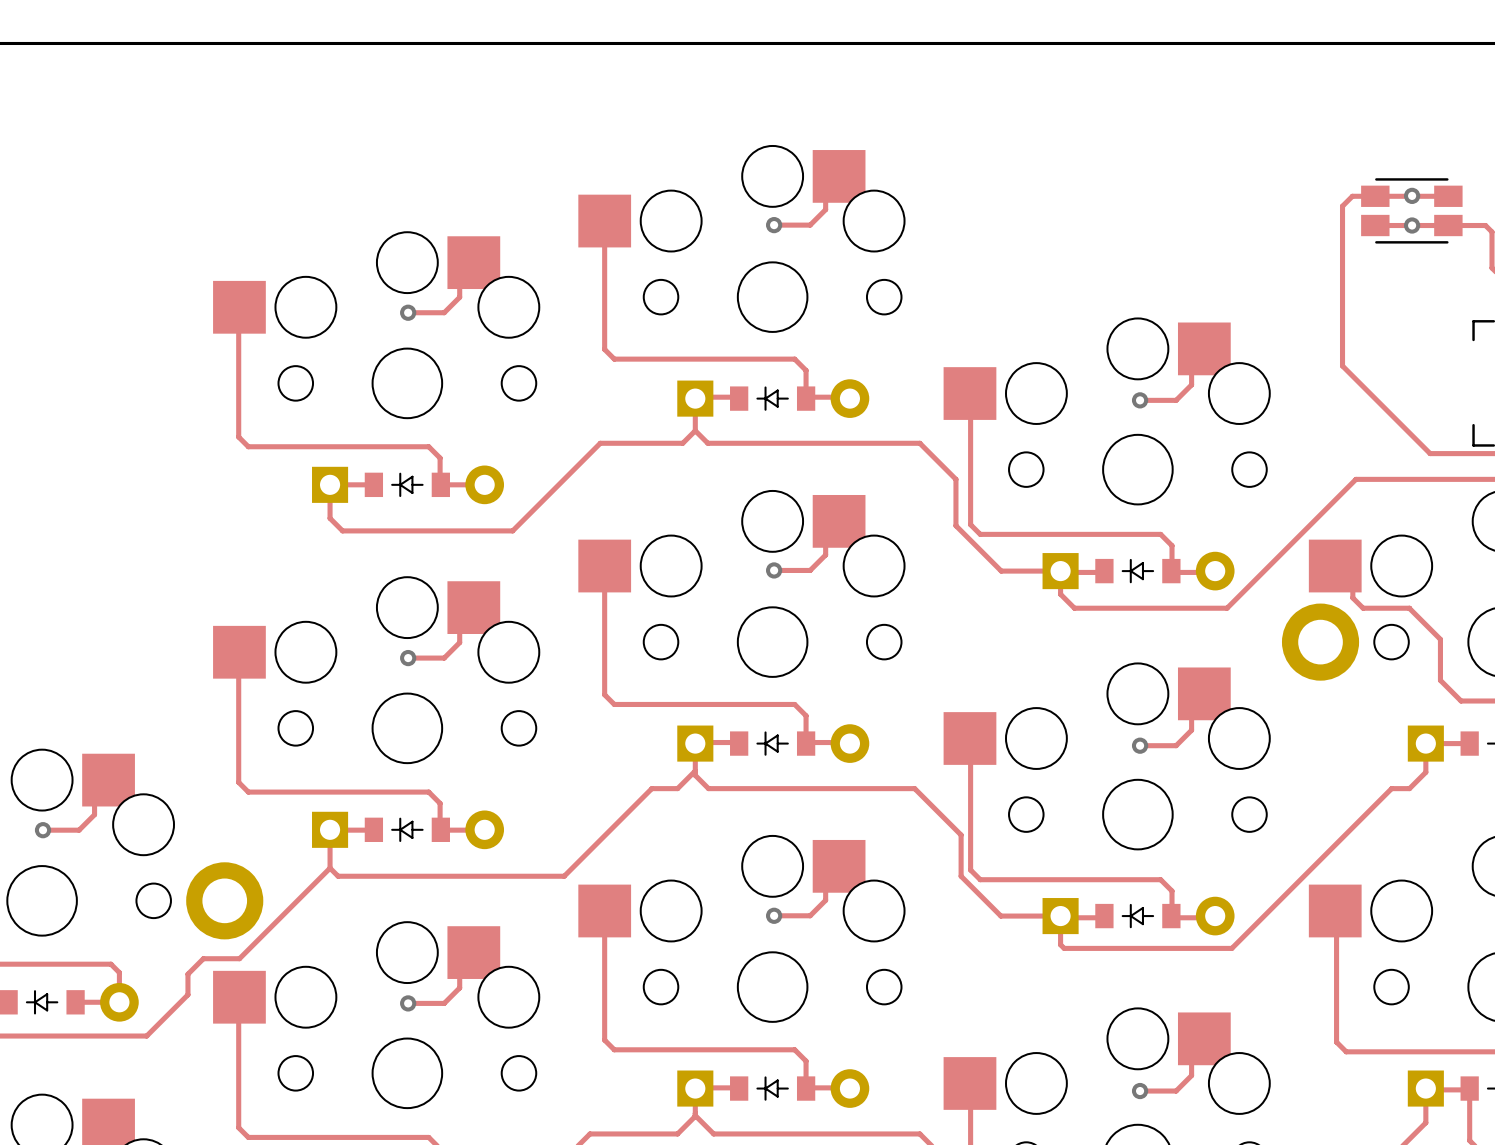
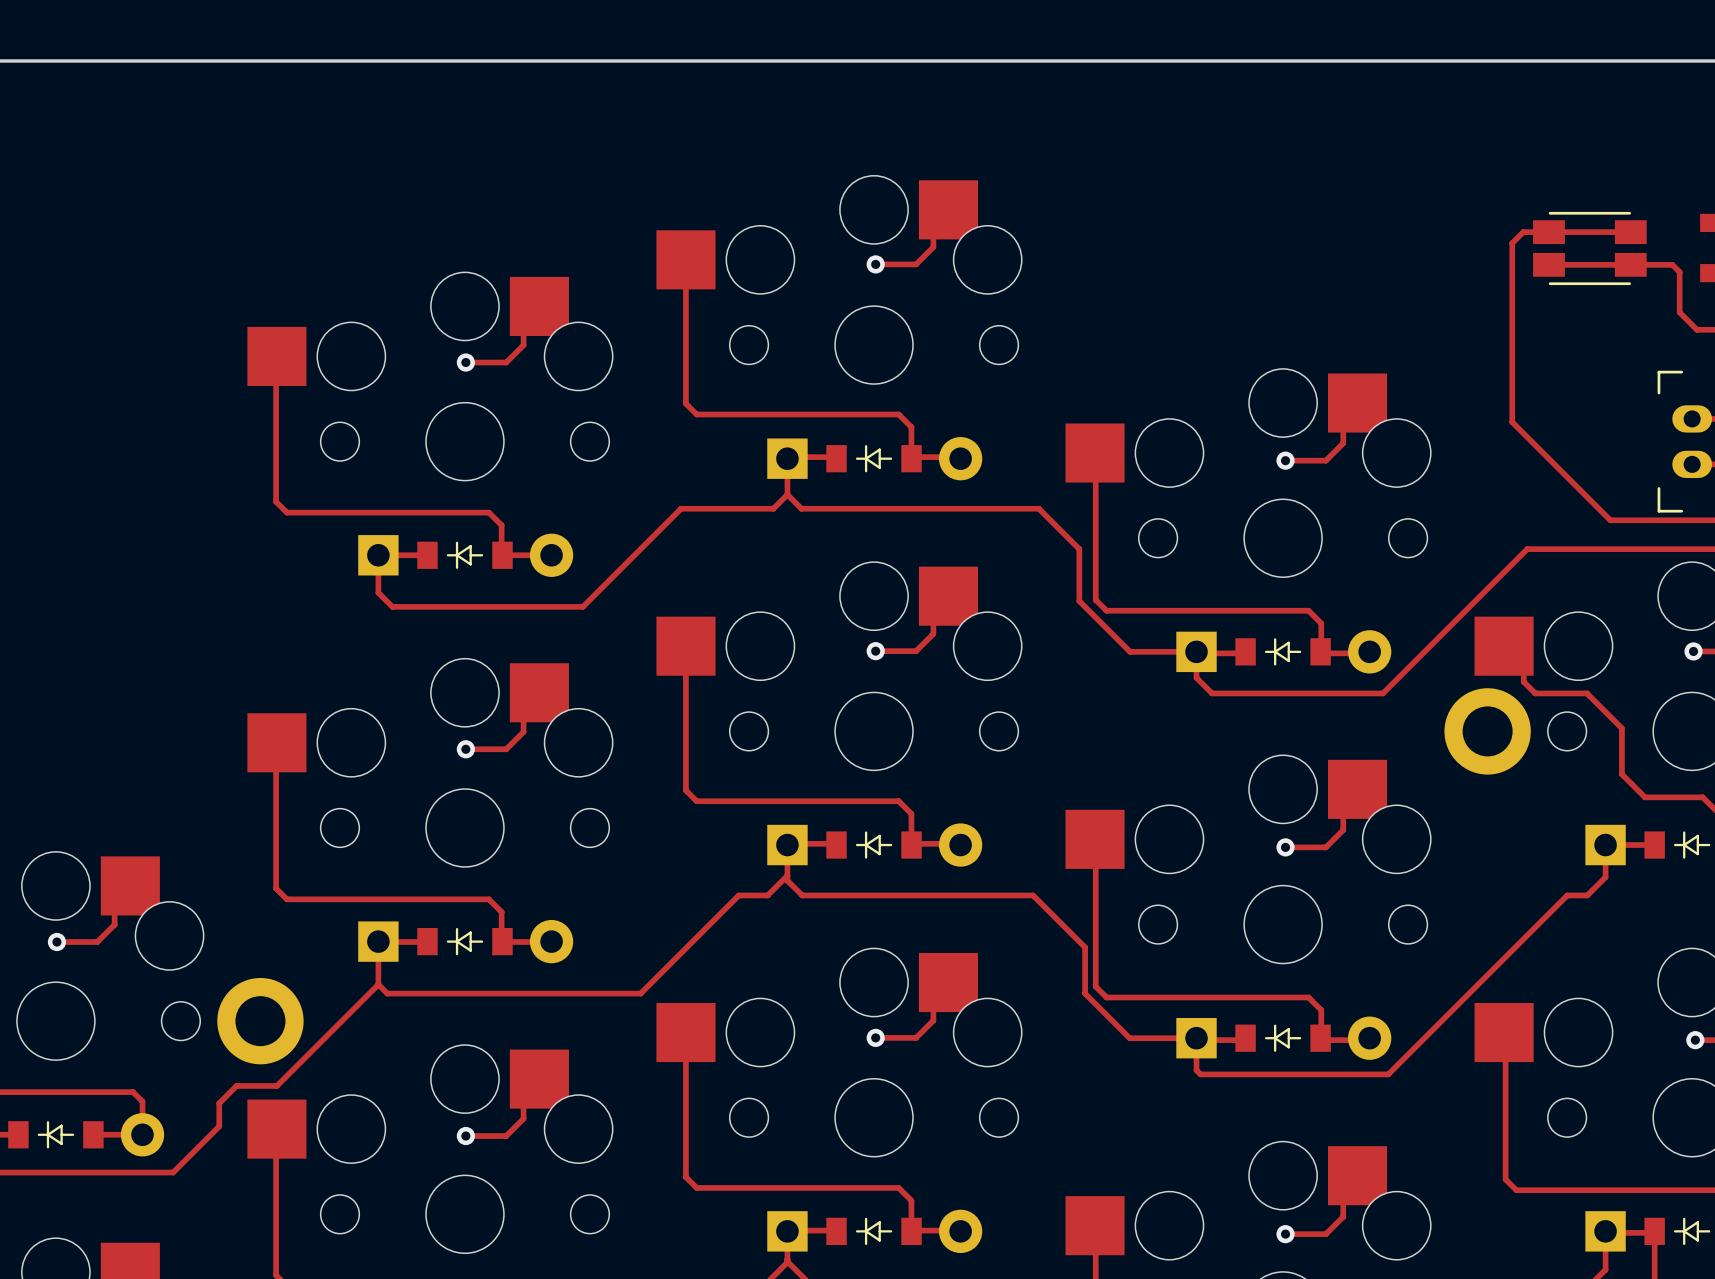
via: (1412, 195) -> none
via: (1412, 225) -> none

